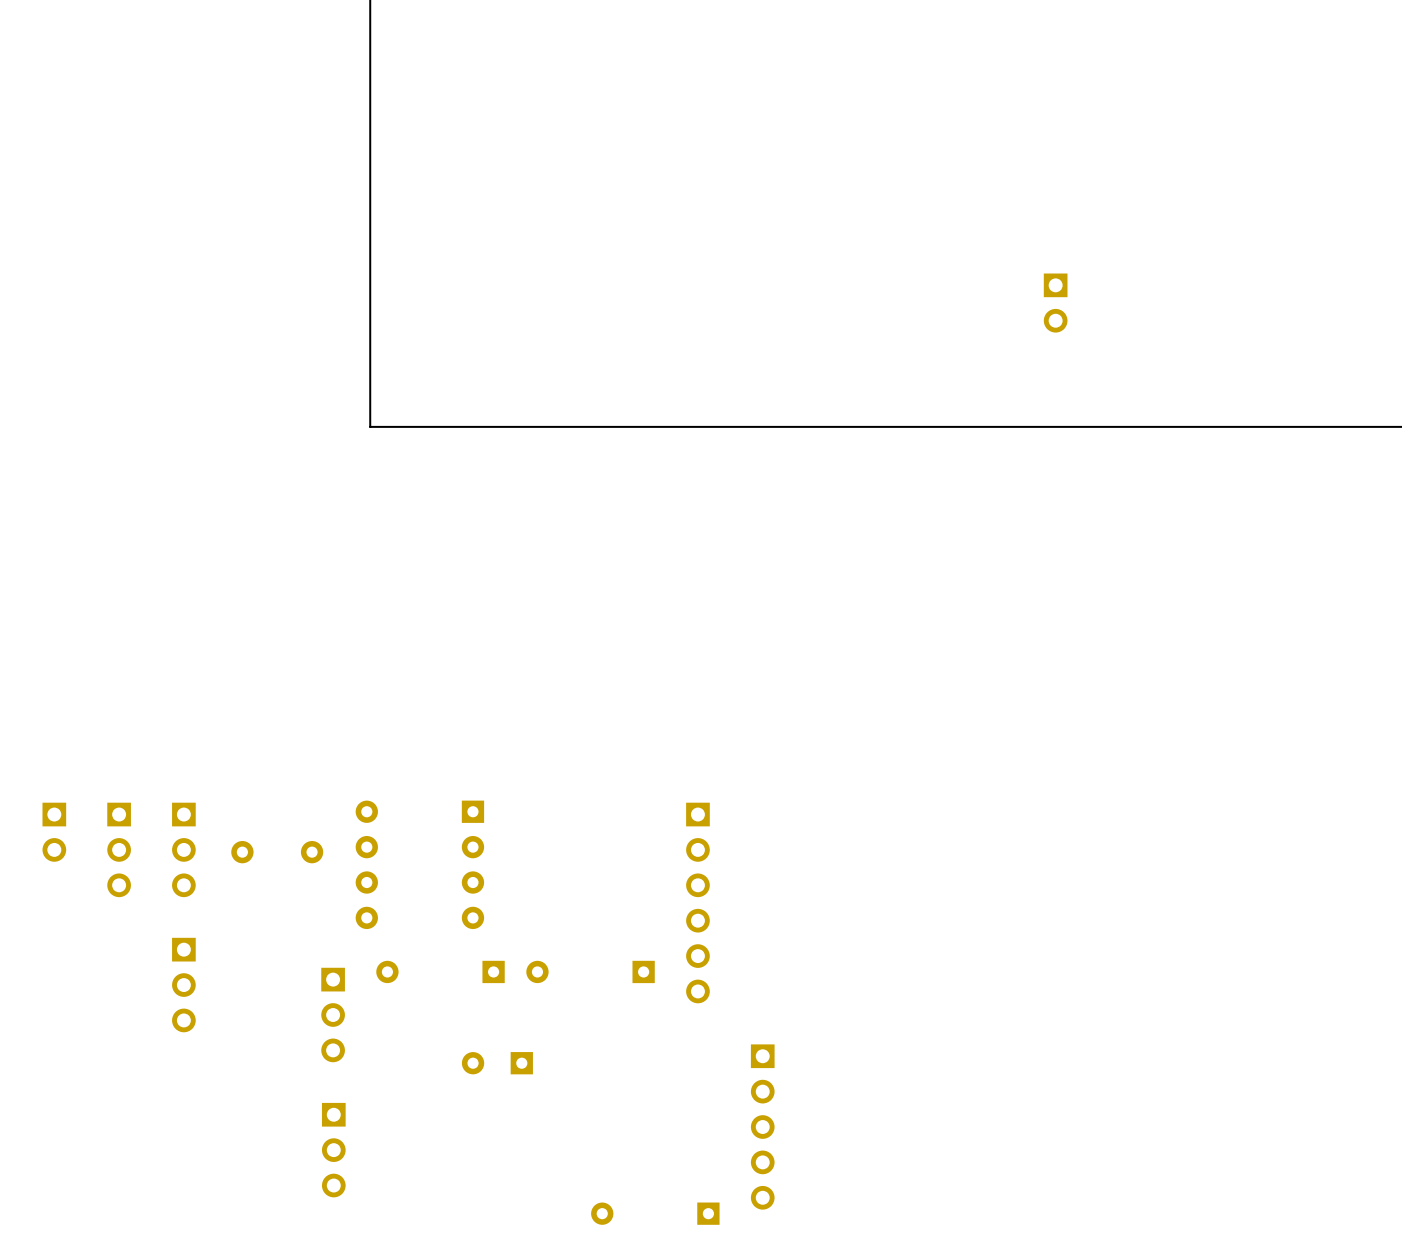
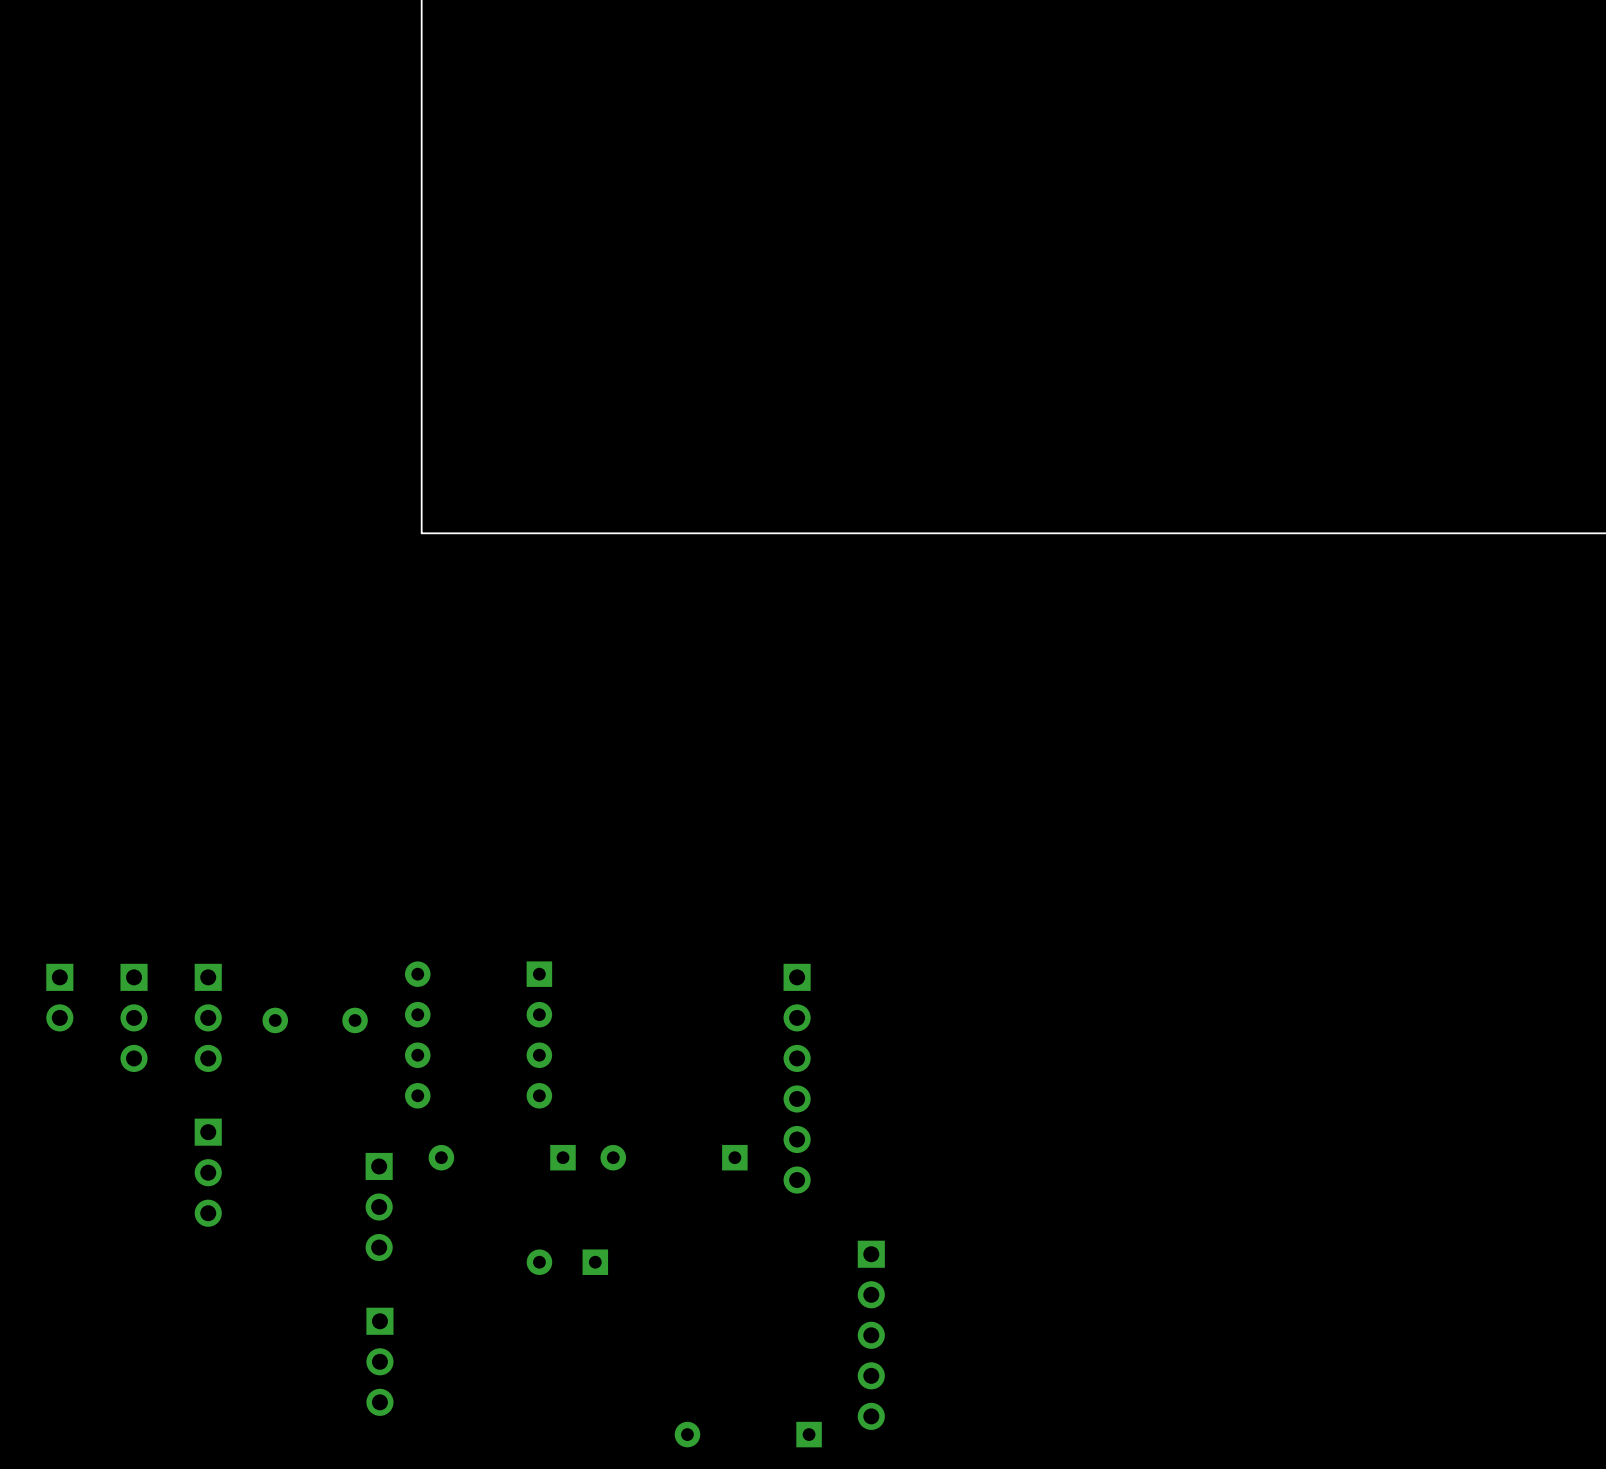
part: (1055, 303) -> none

